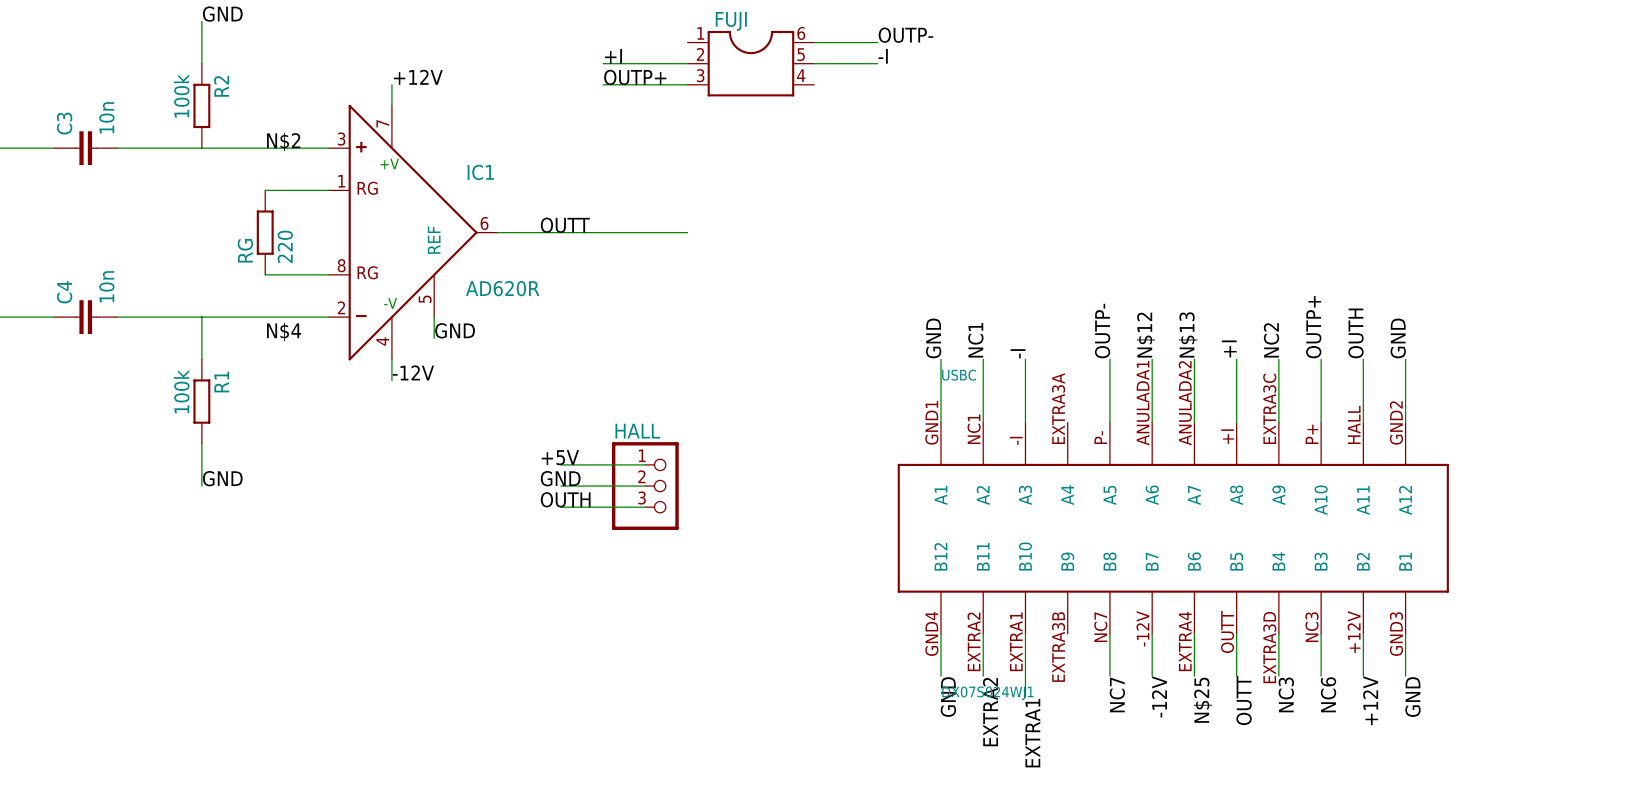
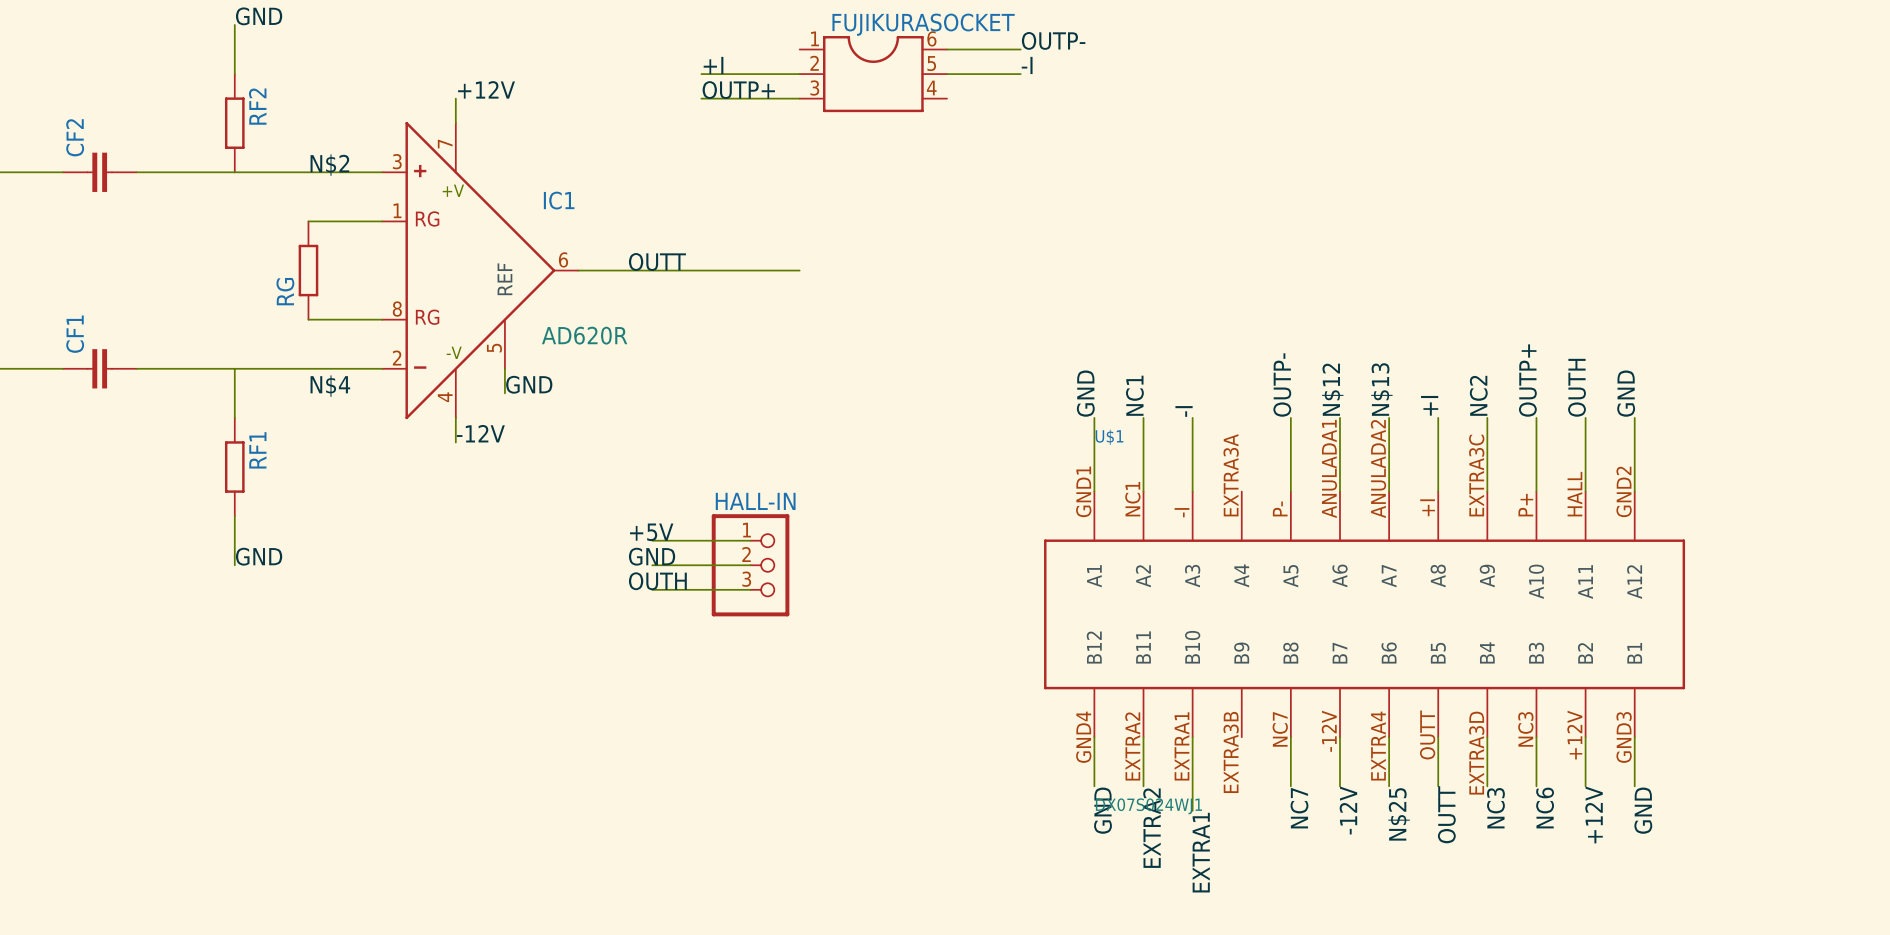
FUJI name: FUJI (731, 21) -> FUJIKURASOCKET (923, 24)
R2 name: R2 (221, 86) -> RF2 (257, 106)
R2 value: 100k (181, 95) -> none
C3 value: 10n (106, 117) -> none
C3 name: C3 (64, 123) -> CF2 (75, 137)
RG value: 220 (285, 246) -> none
C4 value: 10n (106, 286) -> none
C4 name: C4 (64, 292) -> CF1 (75, 334)
USBC name: USBC (959, 375) -> U$1 (1109, 437)
R1 name: R1 (221, 381) -> RF1 (257, 450)
R1 value: 100k (181, 391) -> none
HALL name: HALL (637, 431) -> HALL-IN (755, 501)

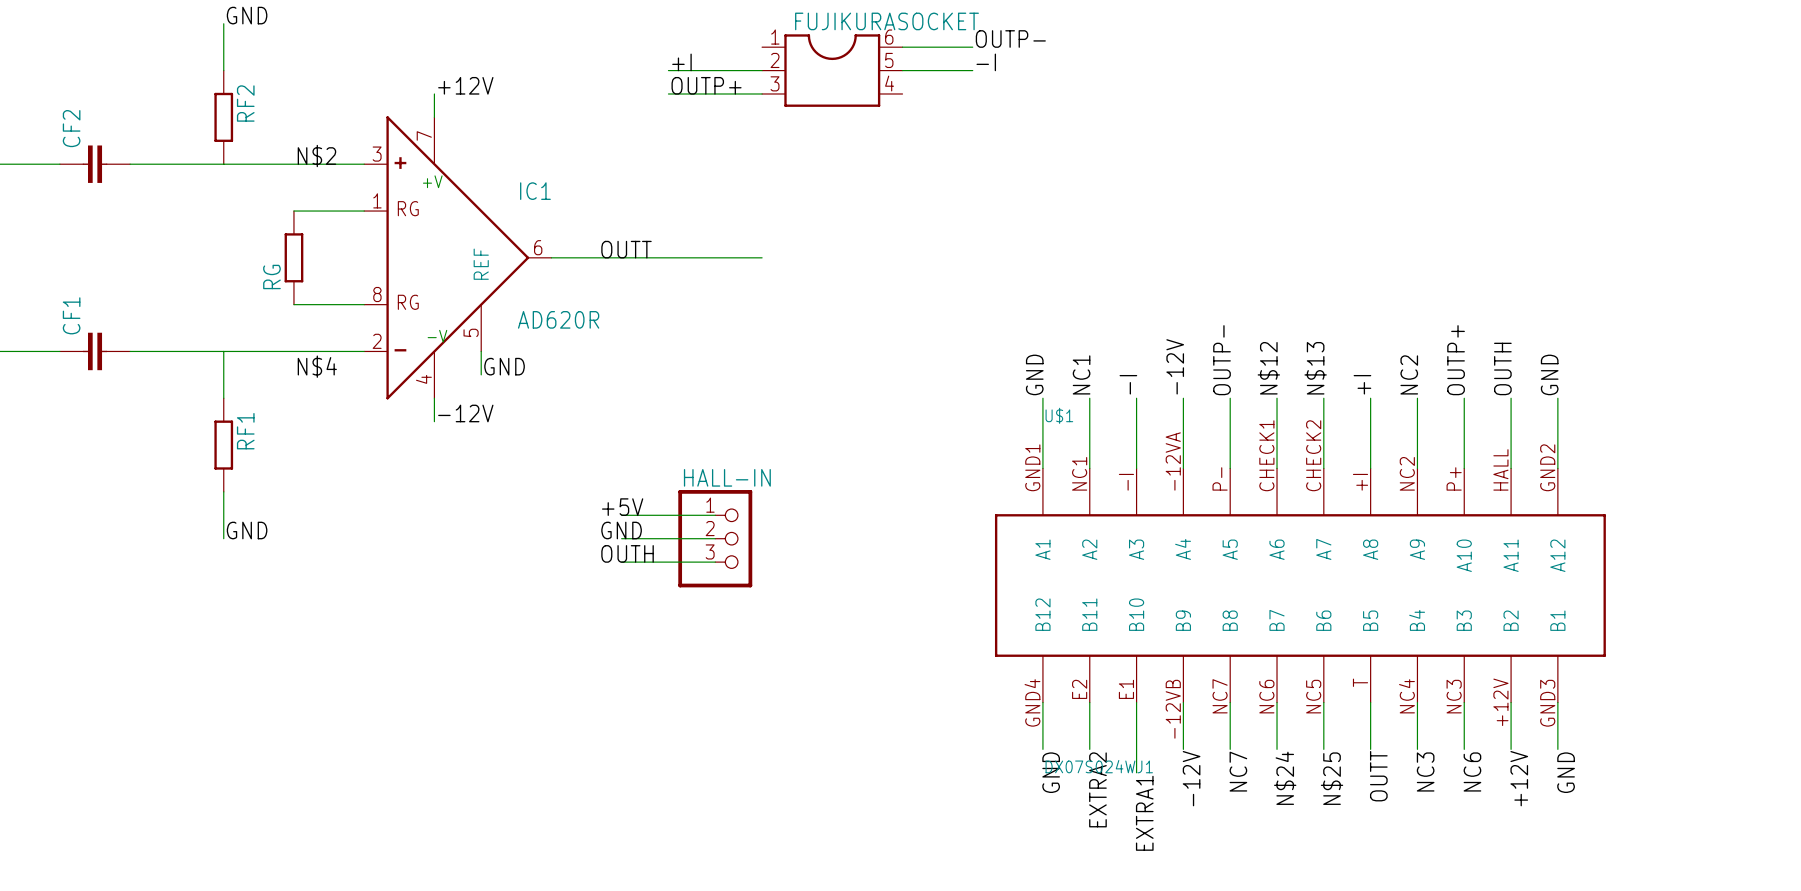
label: none -> -12V (1175, 366)
wire: none -> (1183, 398) (1183, 468)
U$1 symbol: [1044, 491, 1686, 738] -> [994, 468, 1606, 703]
wire: none -> (1183, 702) (1183, 749)
label: none -> -12V (1191, 778)
label: -12V (1348, 810) -> N$24 (1285, 778)

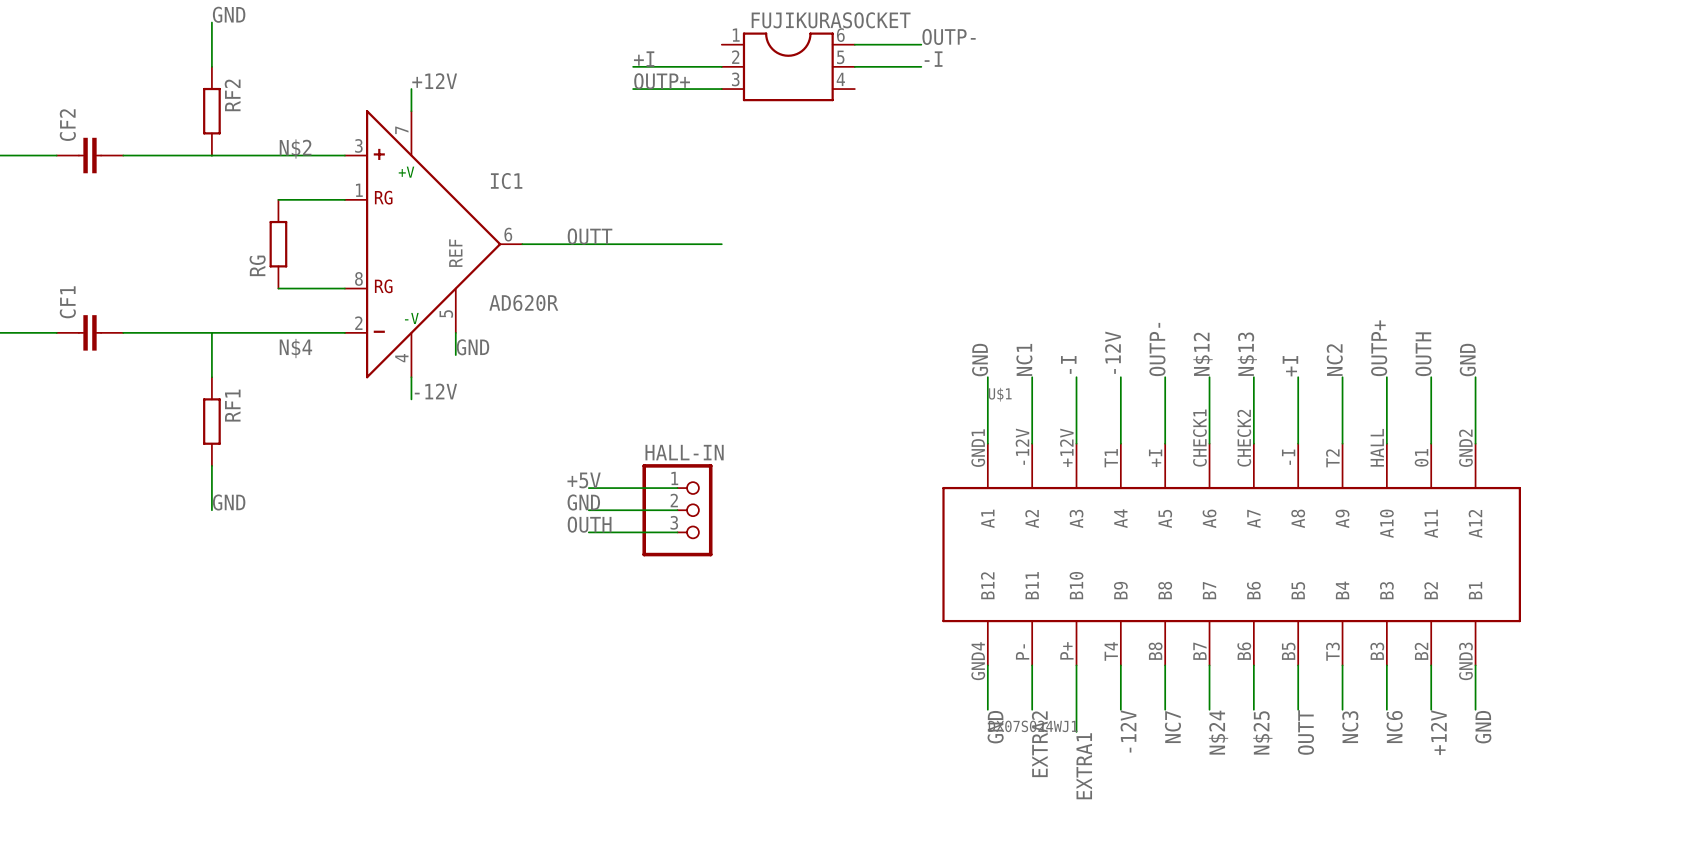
U$1 symbol: [994, 468, 1606, 703] -> [942, 443, 1521, 666]

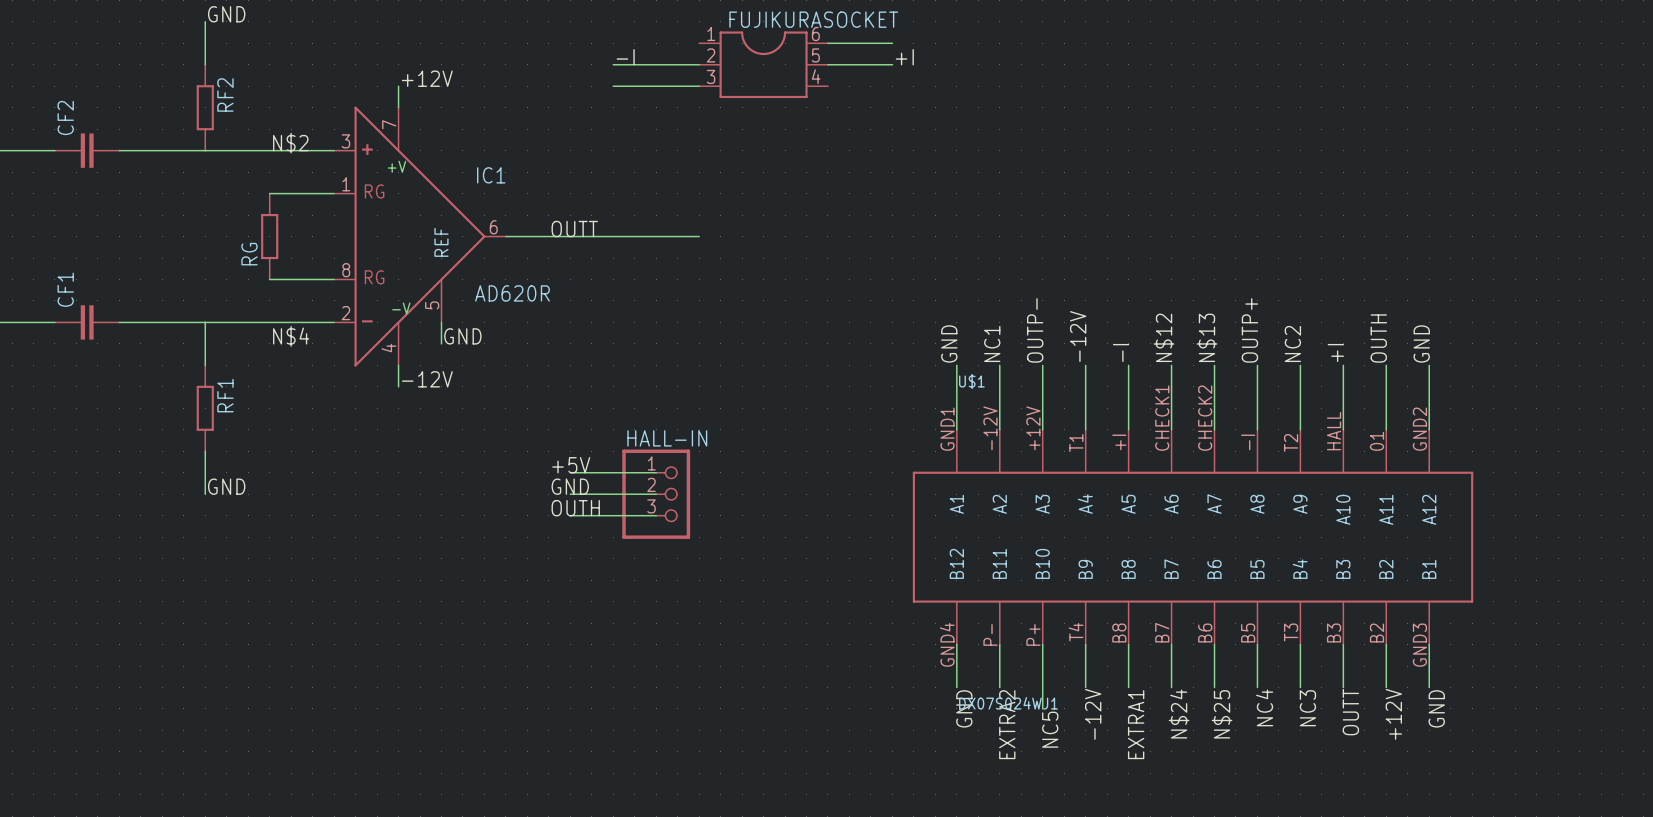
label: OUTP- (949, 36) -> none
label: +I (644, 59) -> -I (625, 57)
label: -I (933, 59) -> +I (904, 57)
label: OUTP+ (662, 81) -> none
label: OUTP+ (1379, 348) -> +I (1335, 352)
label: OUTP- (1157, 349) -> -I (1121, 352)
label: -I (1068, 364) -> OUTP- (1035, 330)
label: +I (1290, 366) -> OUTP+ (1249, 330)
label: NC7 (1172, 727) -> EXTRA1 (1136, 724)
label: NC6 (1394, 727) -> OUTT (1350, 712)
label: OUTT (1305, 732) -> NC4 (1264, 707)
label: EXTRA1 (1084, 766) -> NC5 (1050, 729)

